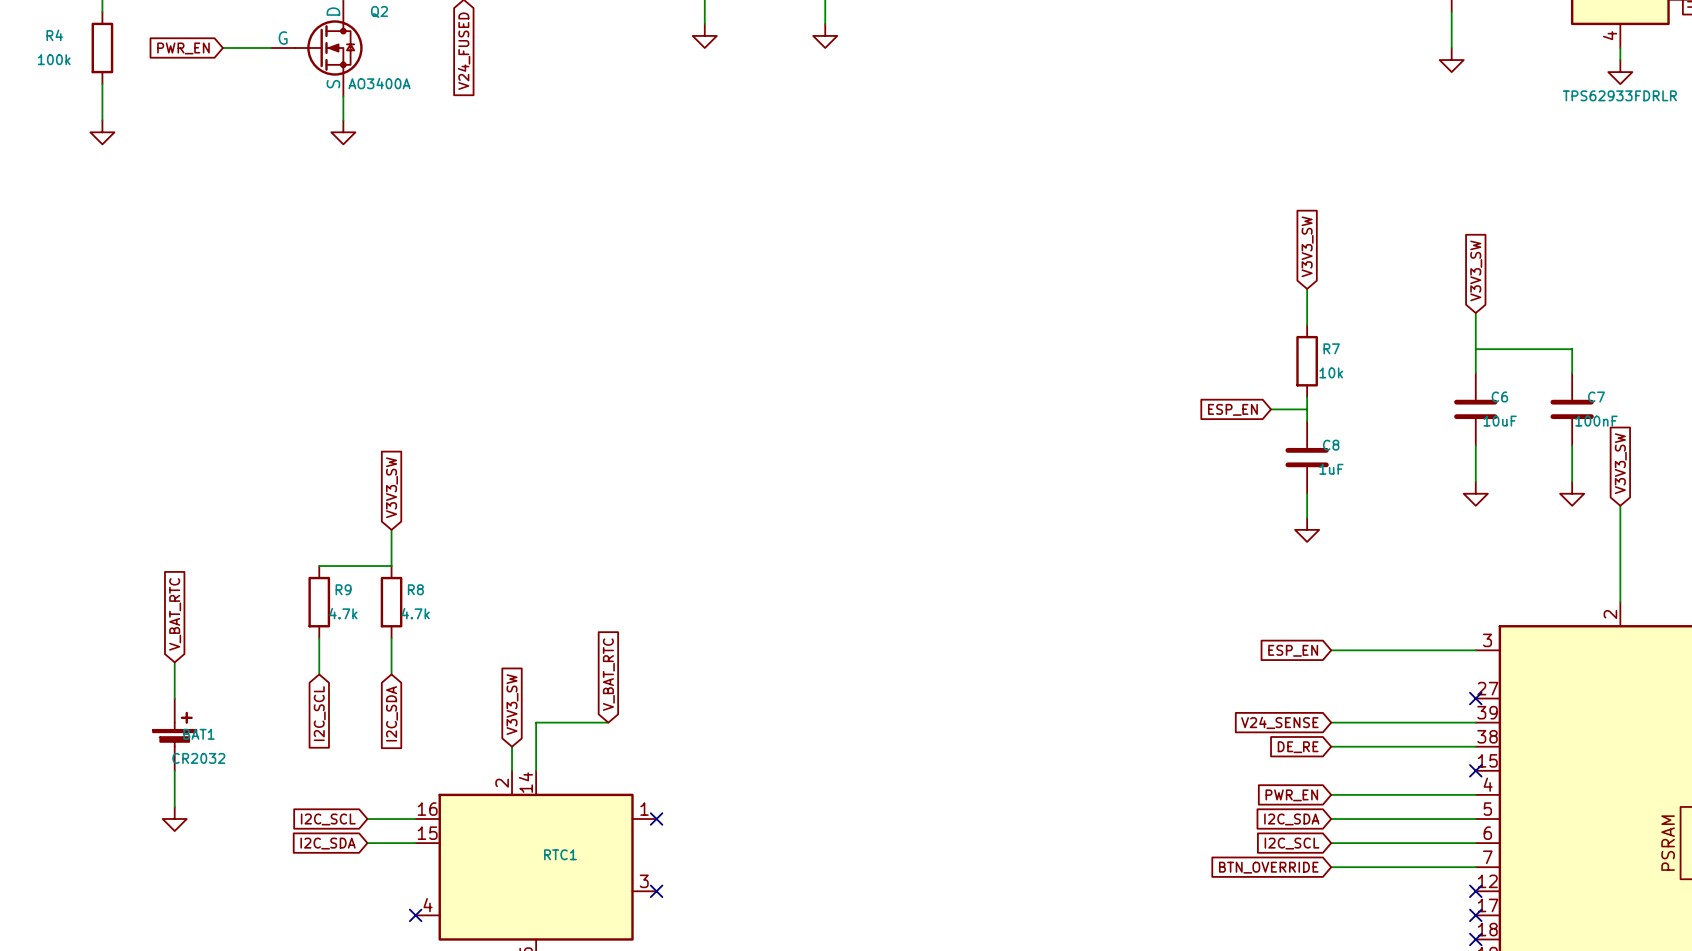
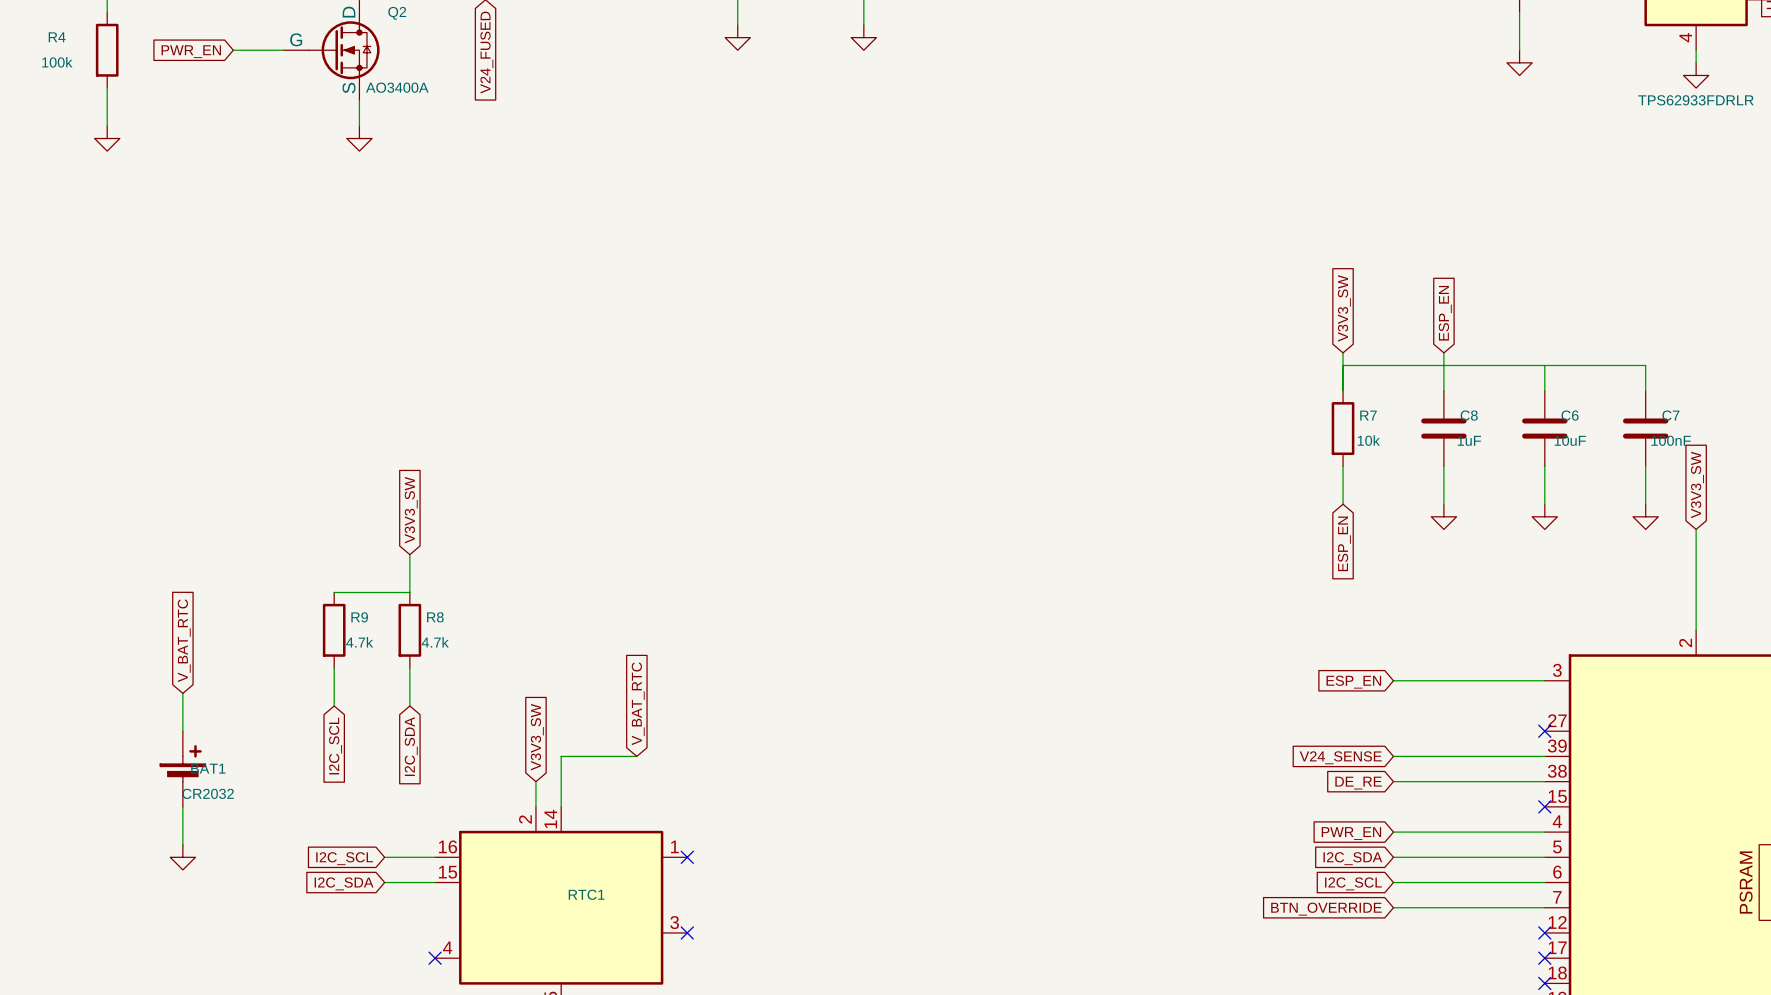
global label position: V3V3_SW (1307, 246) -> V3V3_SW (1344, 308)
global label: V3V3_SW (1476, 270) -> none
wire: (1307, 288) (1307, 325) -> (1343, 352) (1343, 390)
global label: none -> ESP_EN (1445, 313)
wire: (1475, 313) (1475, 349) -> (1343, 365) (1544, 365)
wire: none -> (1443, 352) (1443, 390)
R7 position: (1307, 361) -> (1343, 428)
wire: (1307, 397) (1307, 421) -> none
global label: ESP_EN (1232, 409) -> none
wire: (1270, 409) (1307, 409) -> none
wire: none -> (1343, 466) (1343, 504)
wire: none -> (1443, 466) (1443, 504)
C8 position: (1307, 457) -> (1443, 428)
wire: (1307, 493) (1307, 517) -> none
global label: none -> ESP_EN (1344, 543)
power symbol position: (1307, 529) -> (1443, 516)

